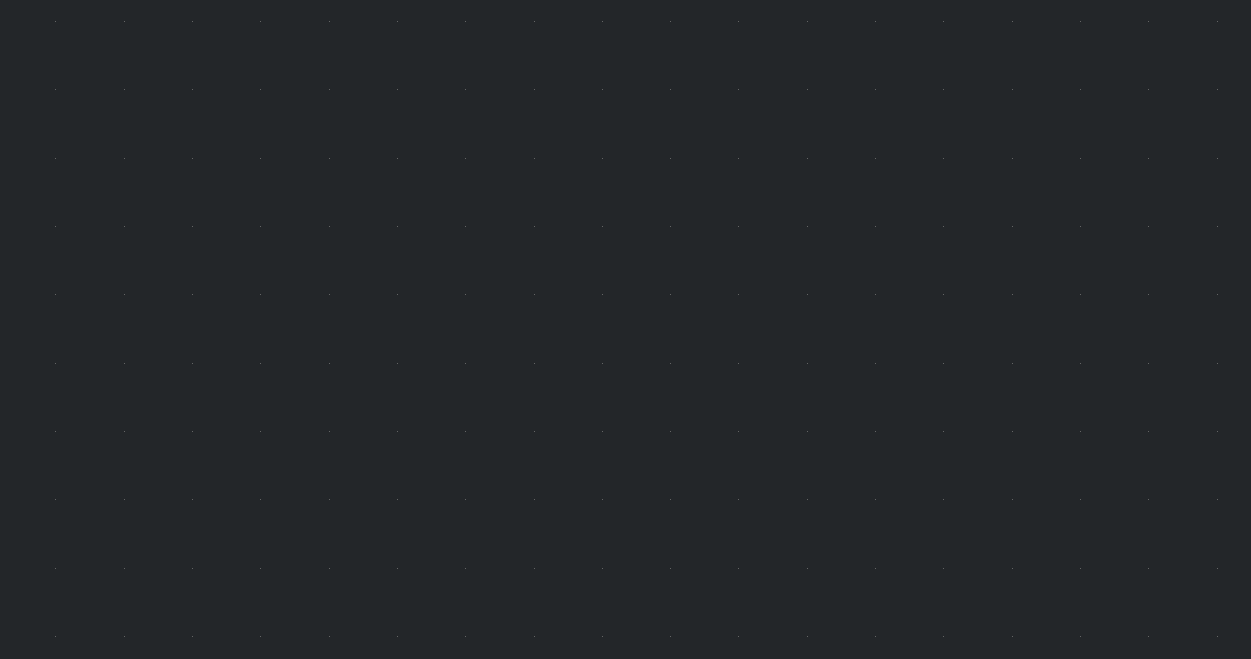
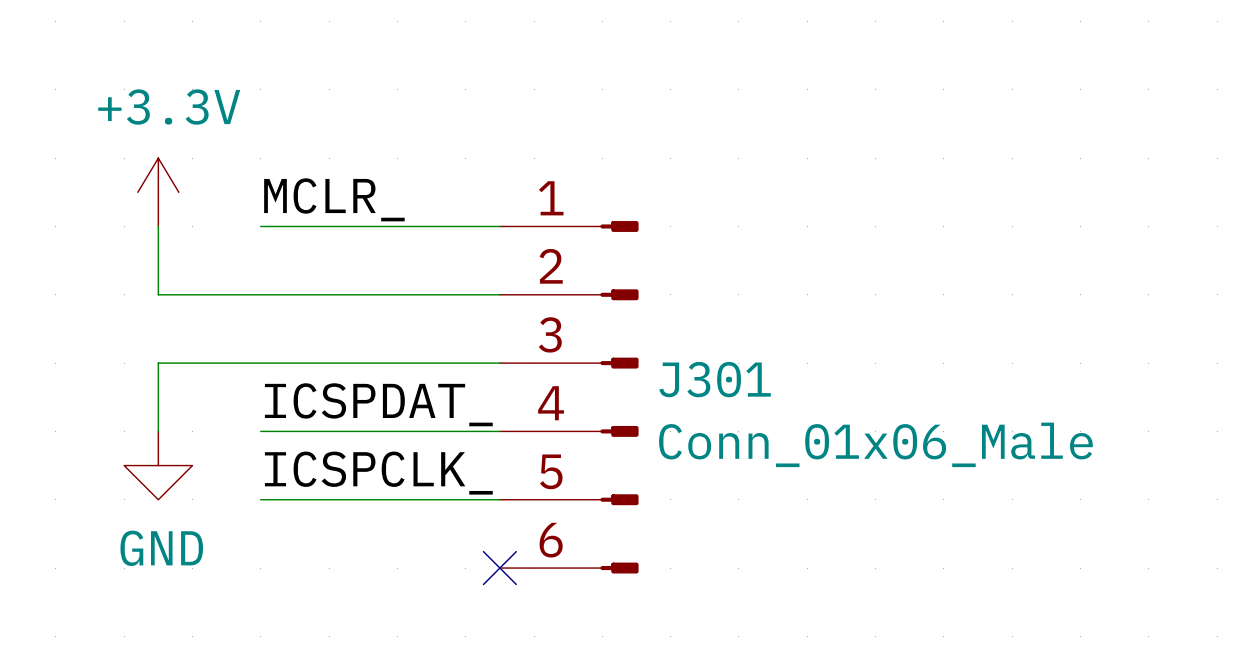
power symbol: none -> +3.3V (158, 192)
label: none -> MCLR_ (334, 199)
wire: none -> (158, 226) (158, 294) (499, 294)
wire: none -> (260, 226) (499, 226)
wire: none -> (499, 363) (158, 363) (158, 431)
J301: none -> Conn_01x06_Male (569, 397)
label: none -> ICSPDAT_ (378, 404)
wire: none -> (260, 431) (499, 431)
power symbol: none -> GND (158, 465)
label: none -> ICSPCLK_ (378, 473)
wire: none -> (260, 499) (499, 499)
no-connect mark: none -> (499, 568)

